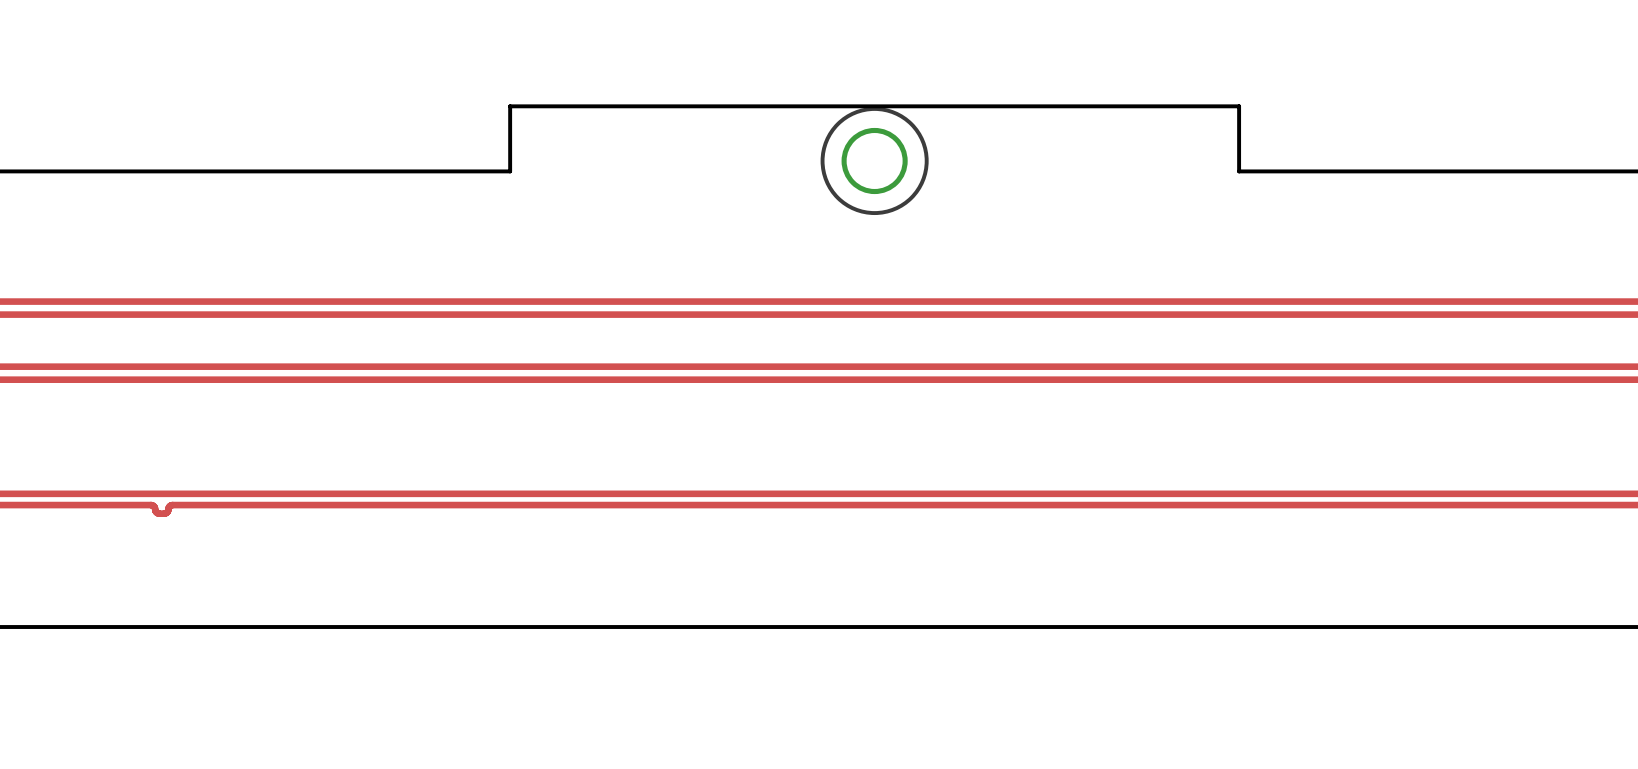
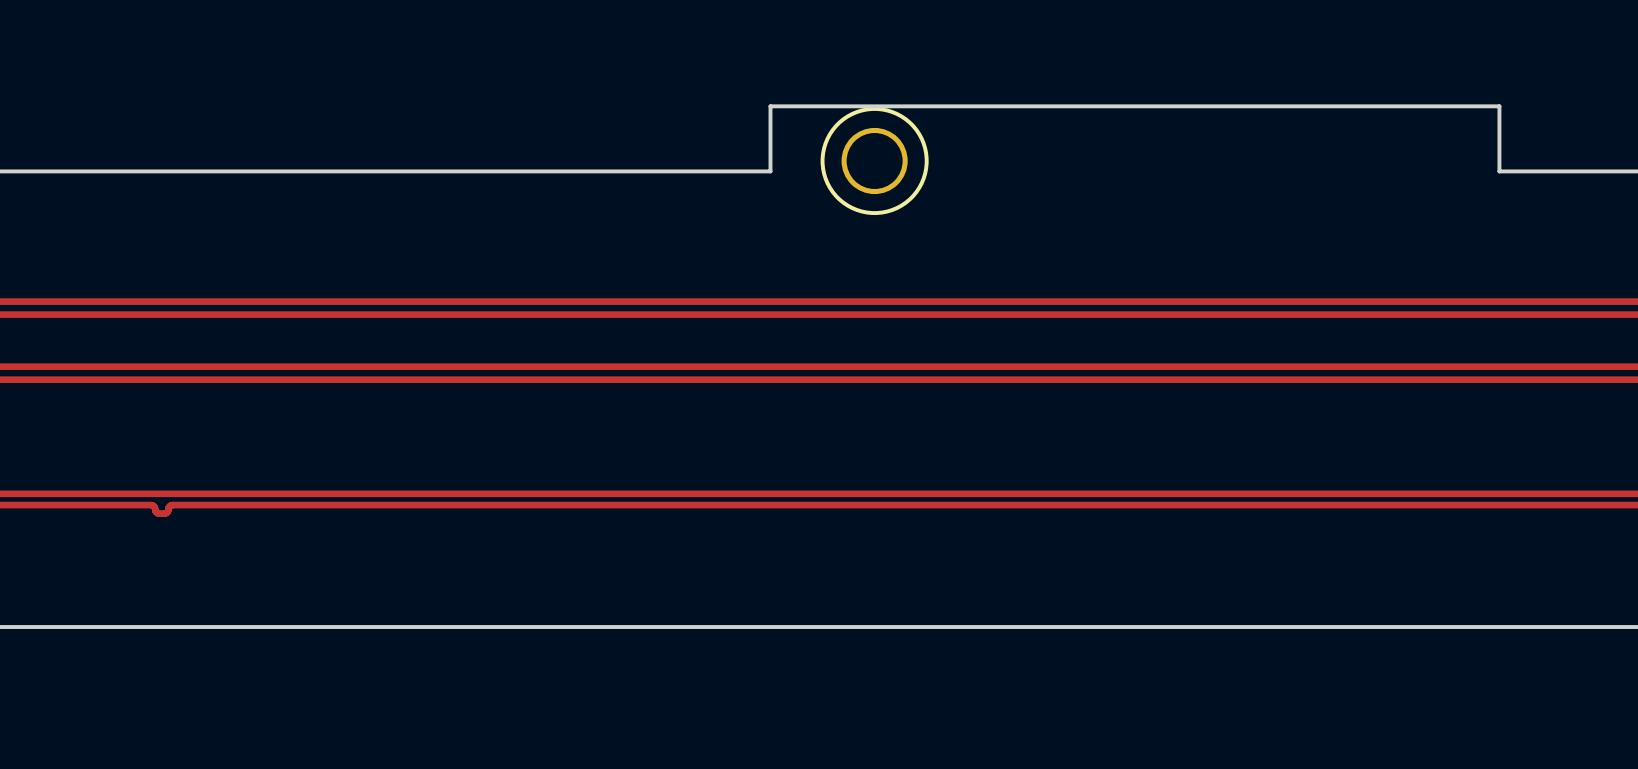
board edge: (770, 106) (510, 106) (510, 171) -> (770, 106) (770, 171) (510, 171)
board edge: (1239, 106) (1239, 171) (1499, 171) -> (1239, 106) (1499, 106) (1499, 171)

